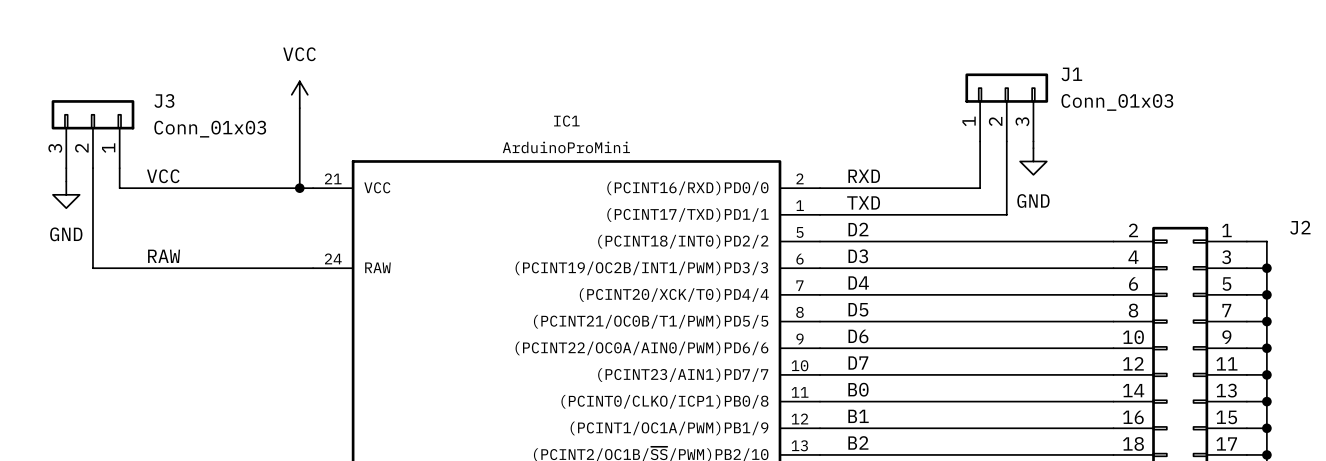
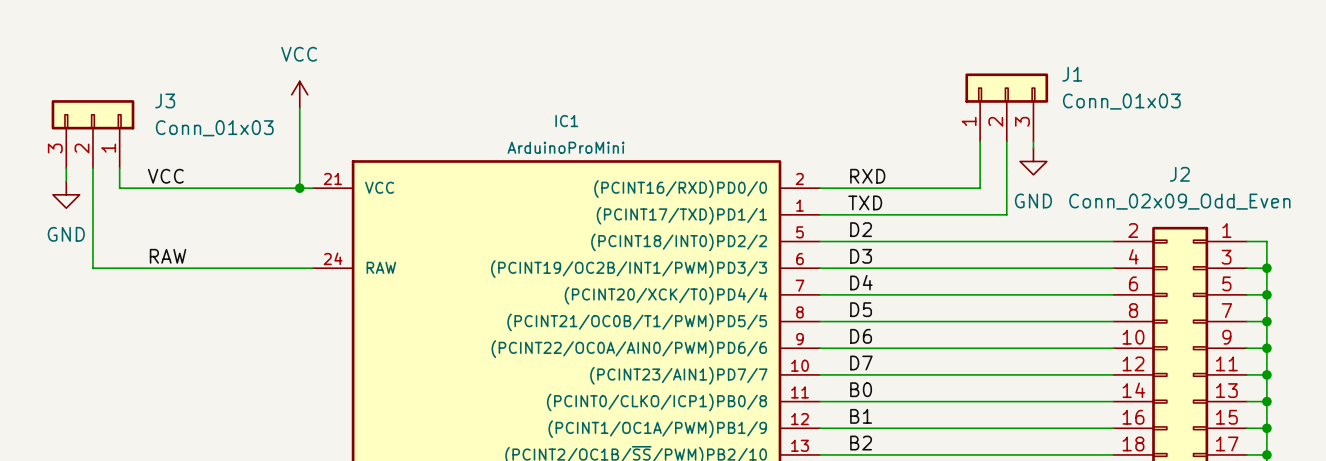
J2 value: none -> Conn_02x09_Odd_Even (1179, 201)
J2 name position: J2 (1300, 227) -> J2 (1179, 174)

